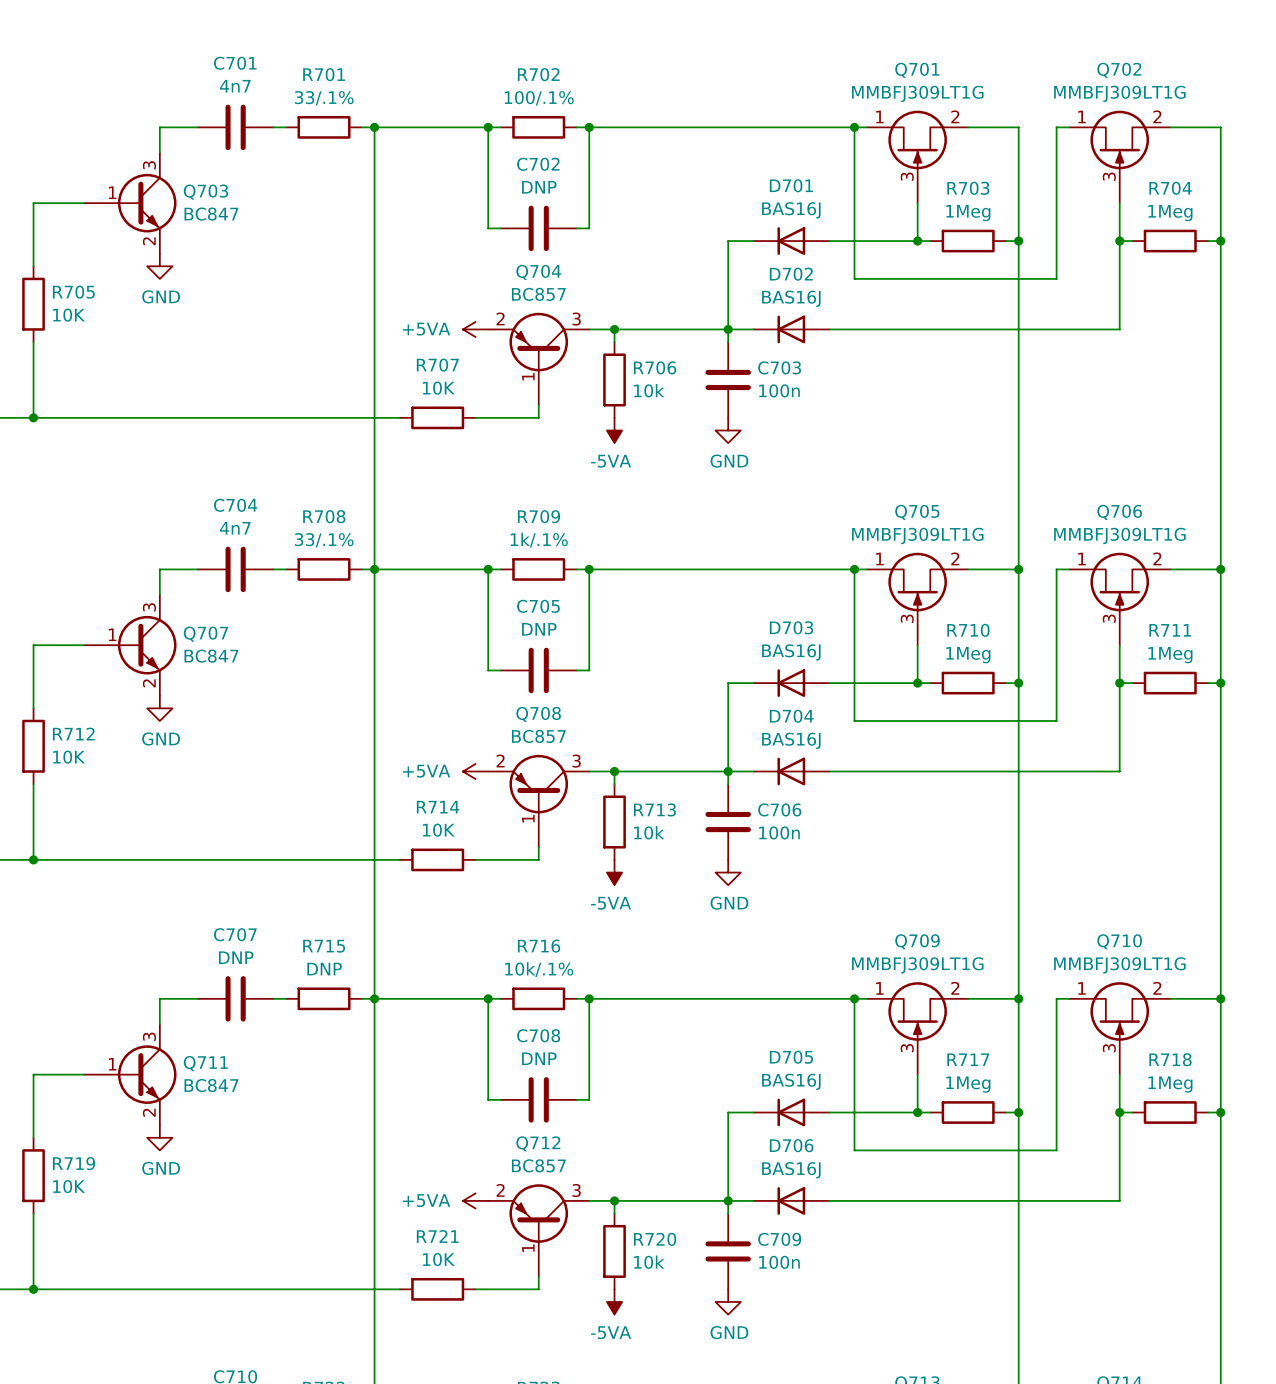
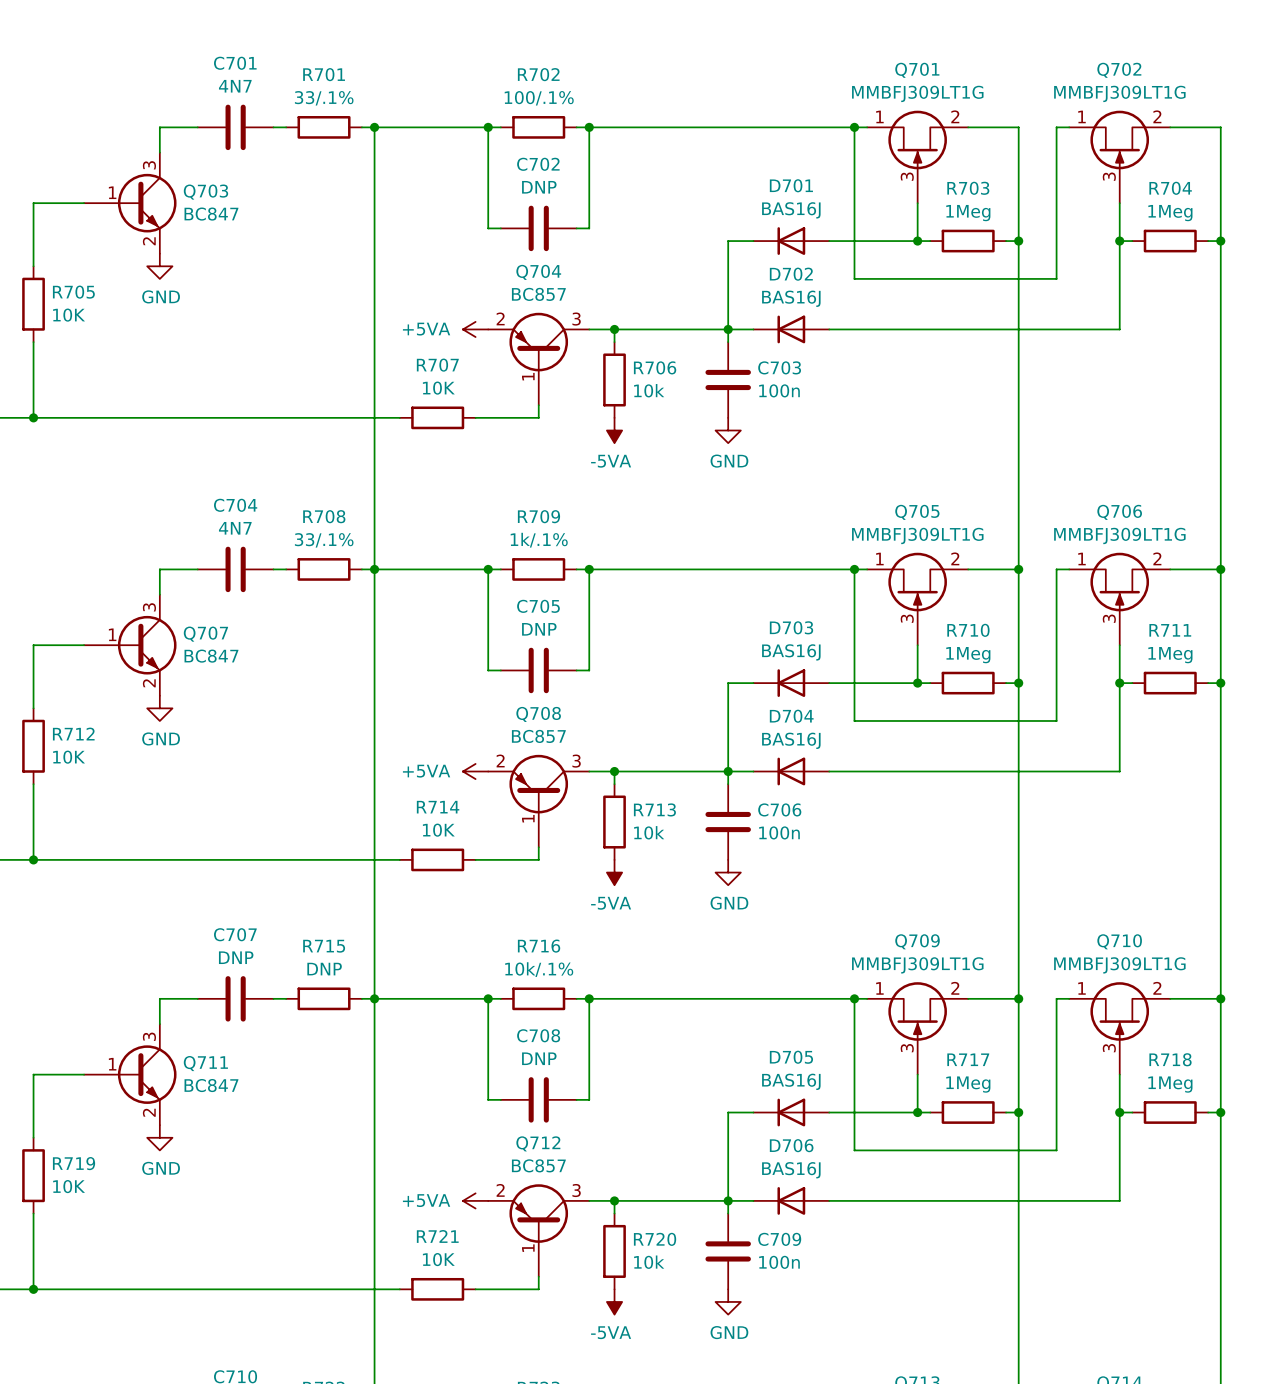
C701 value: 4n7 (235, 86) -> 4N7 (235, 86)
C704 value: 4n7 (235, 528) -> 4N7 (235, 528)

